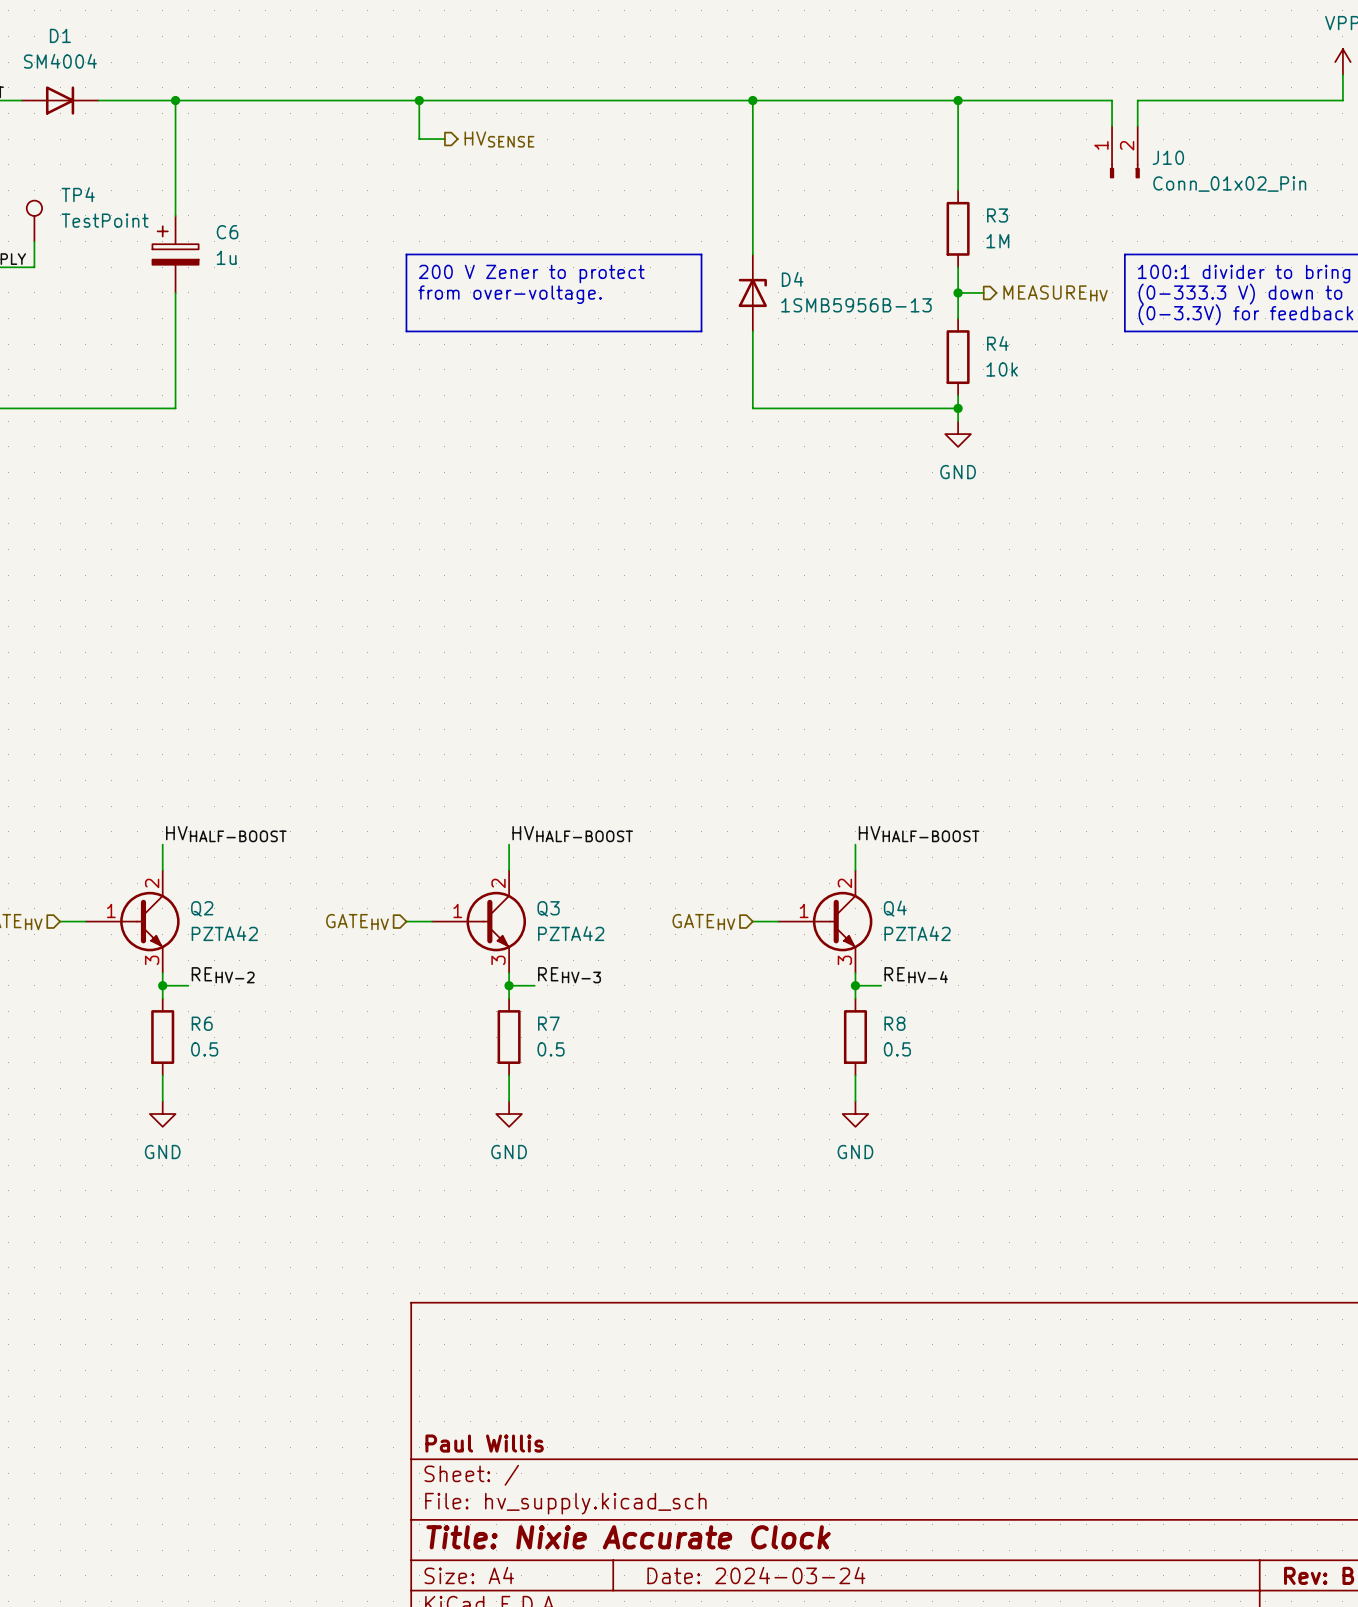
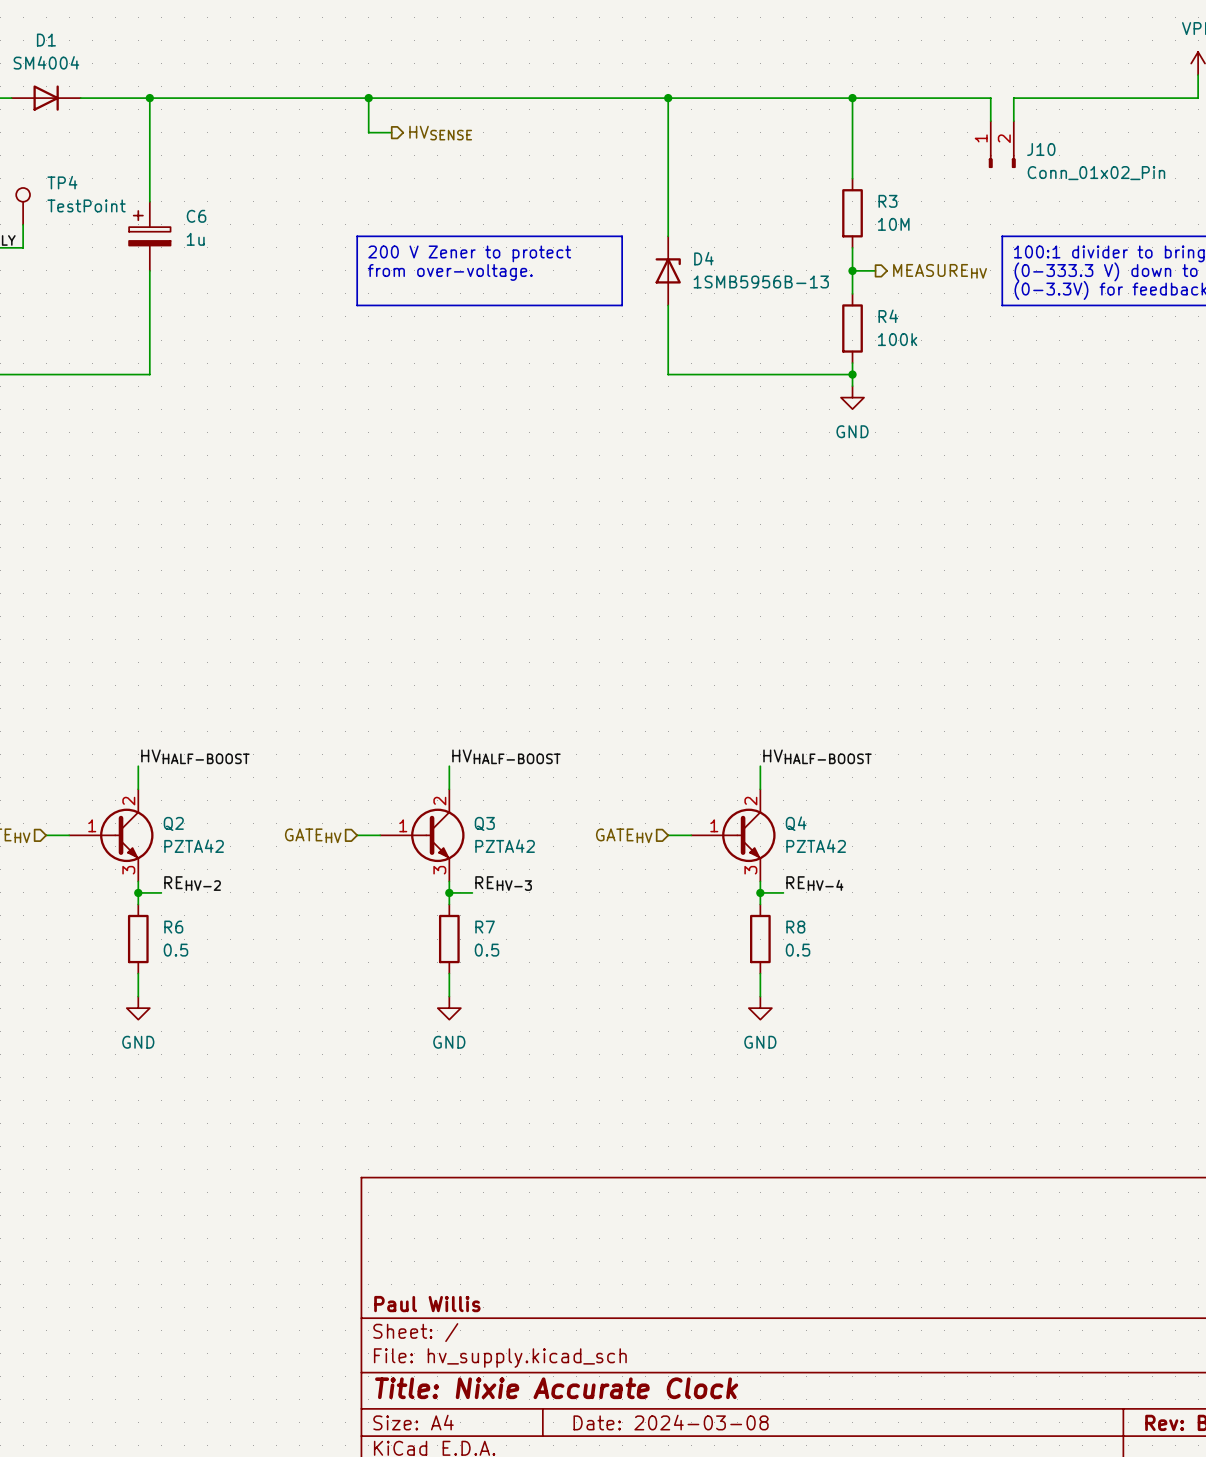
R3 value: 1M (997, 241) -> 10M (893, 224)
R4 value: 10k (1002, 369) -> 100k (897, 339)
title block: Date: 2024-03-24 (756, 1575) -> Date: 2024-03-08 (671, 1422)

